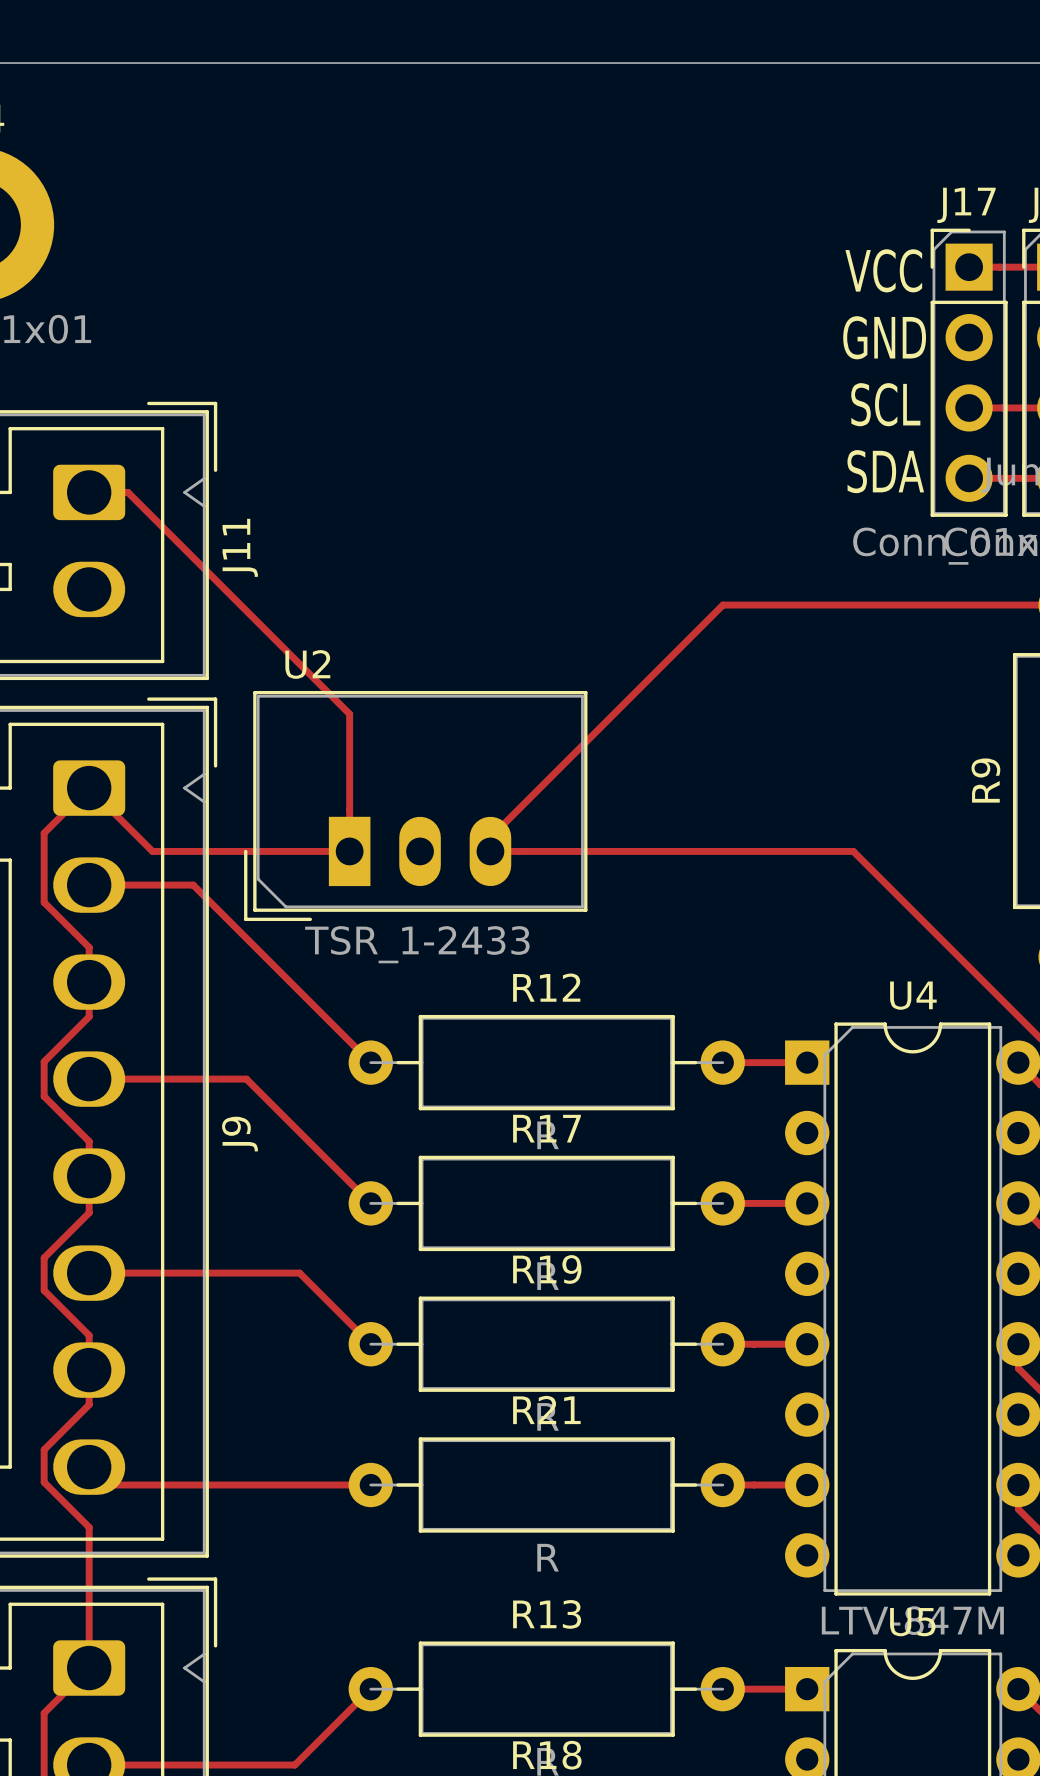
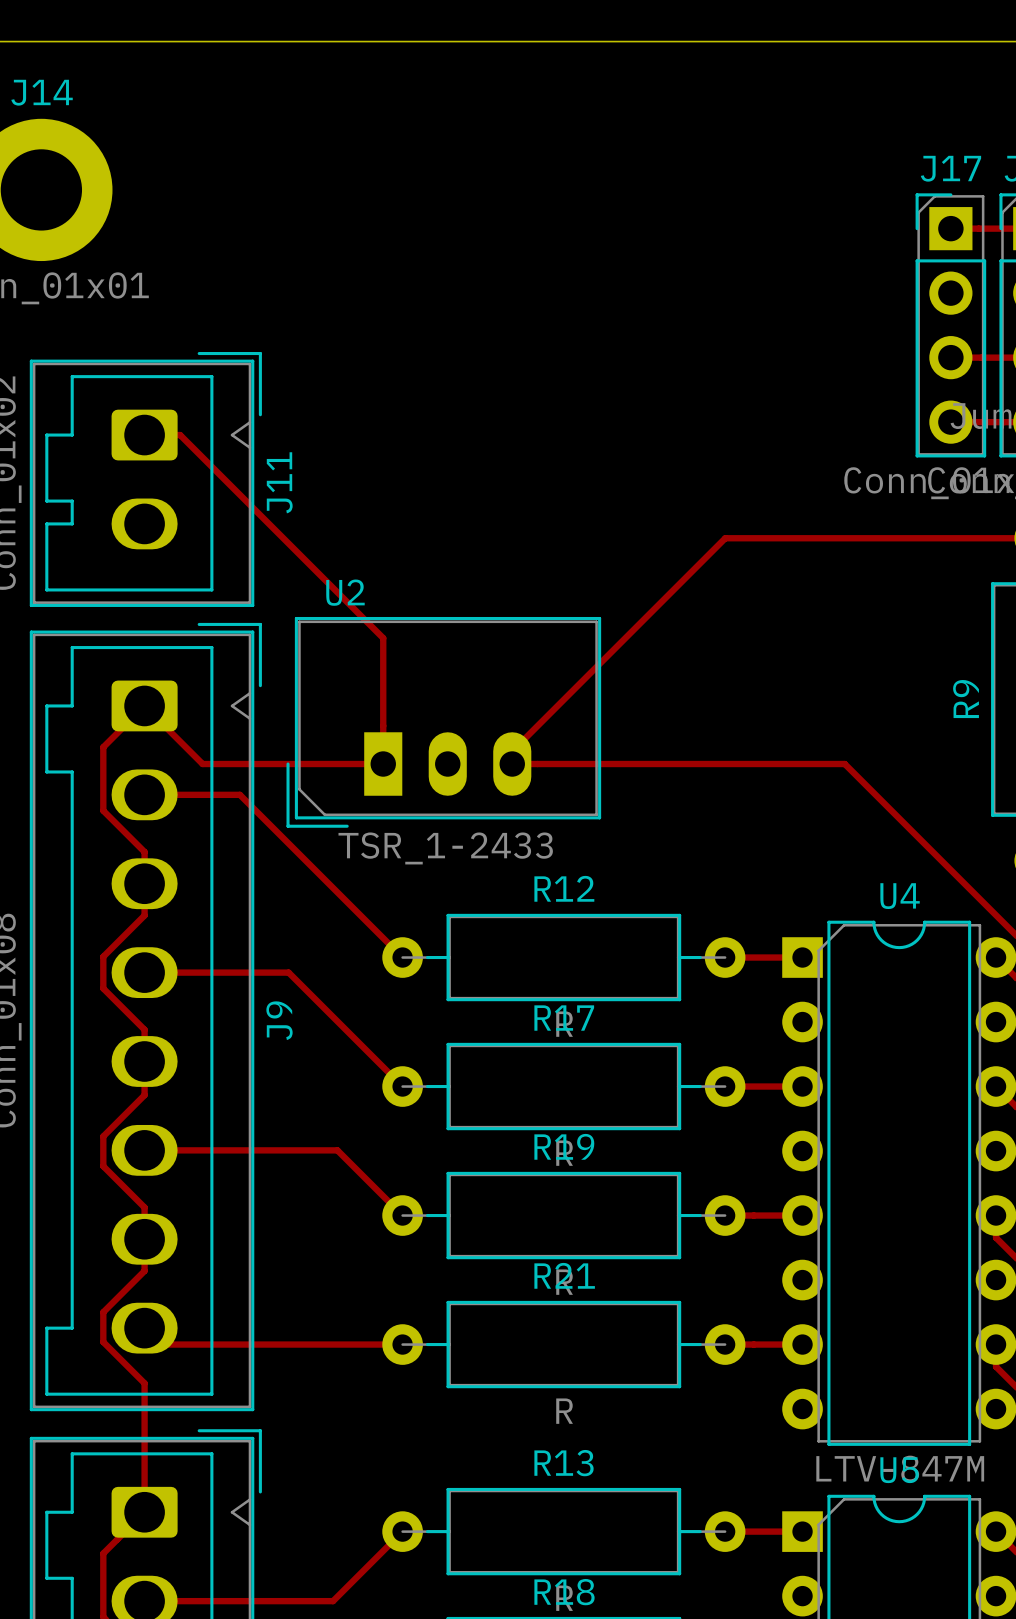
text: VCC (883, 270) -> none
text: GND (884, 337) -> none
text: SCL (885, 404) -> none
text: SDA (885, 471) -> none

